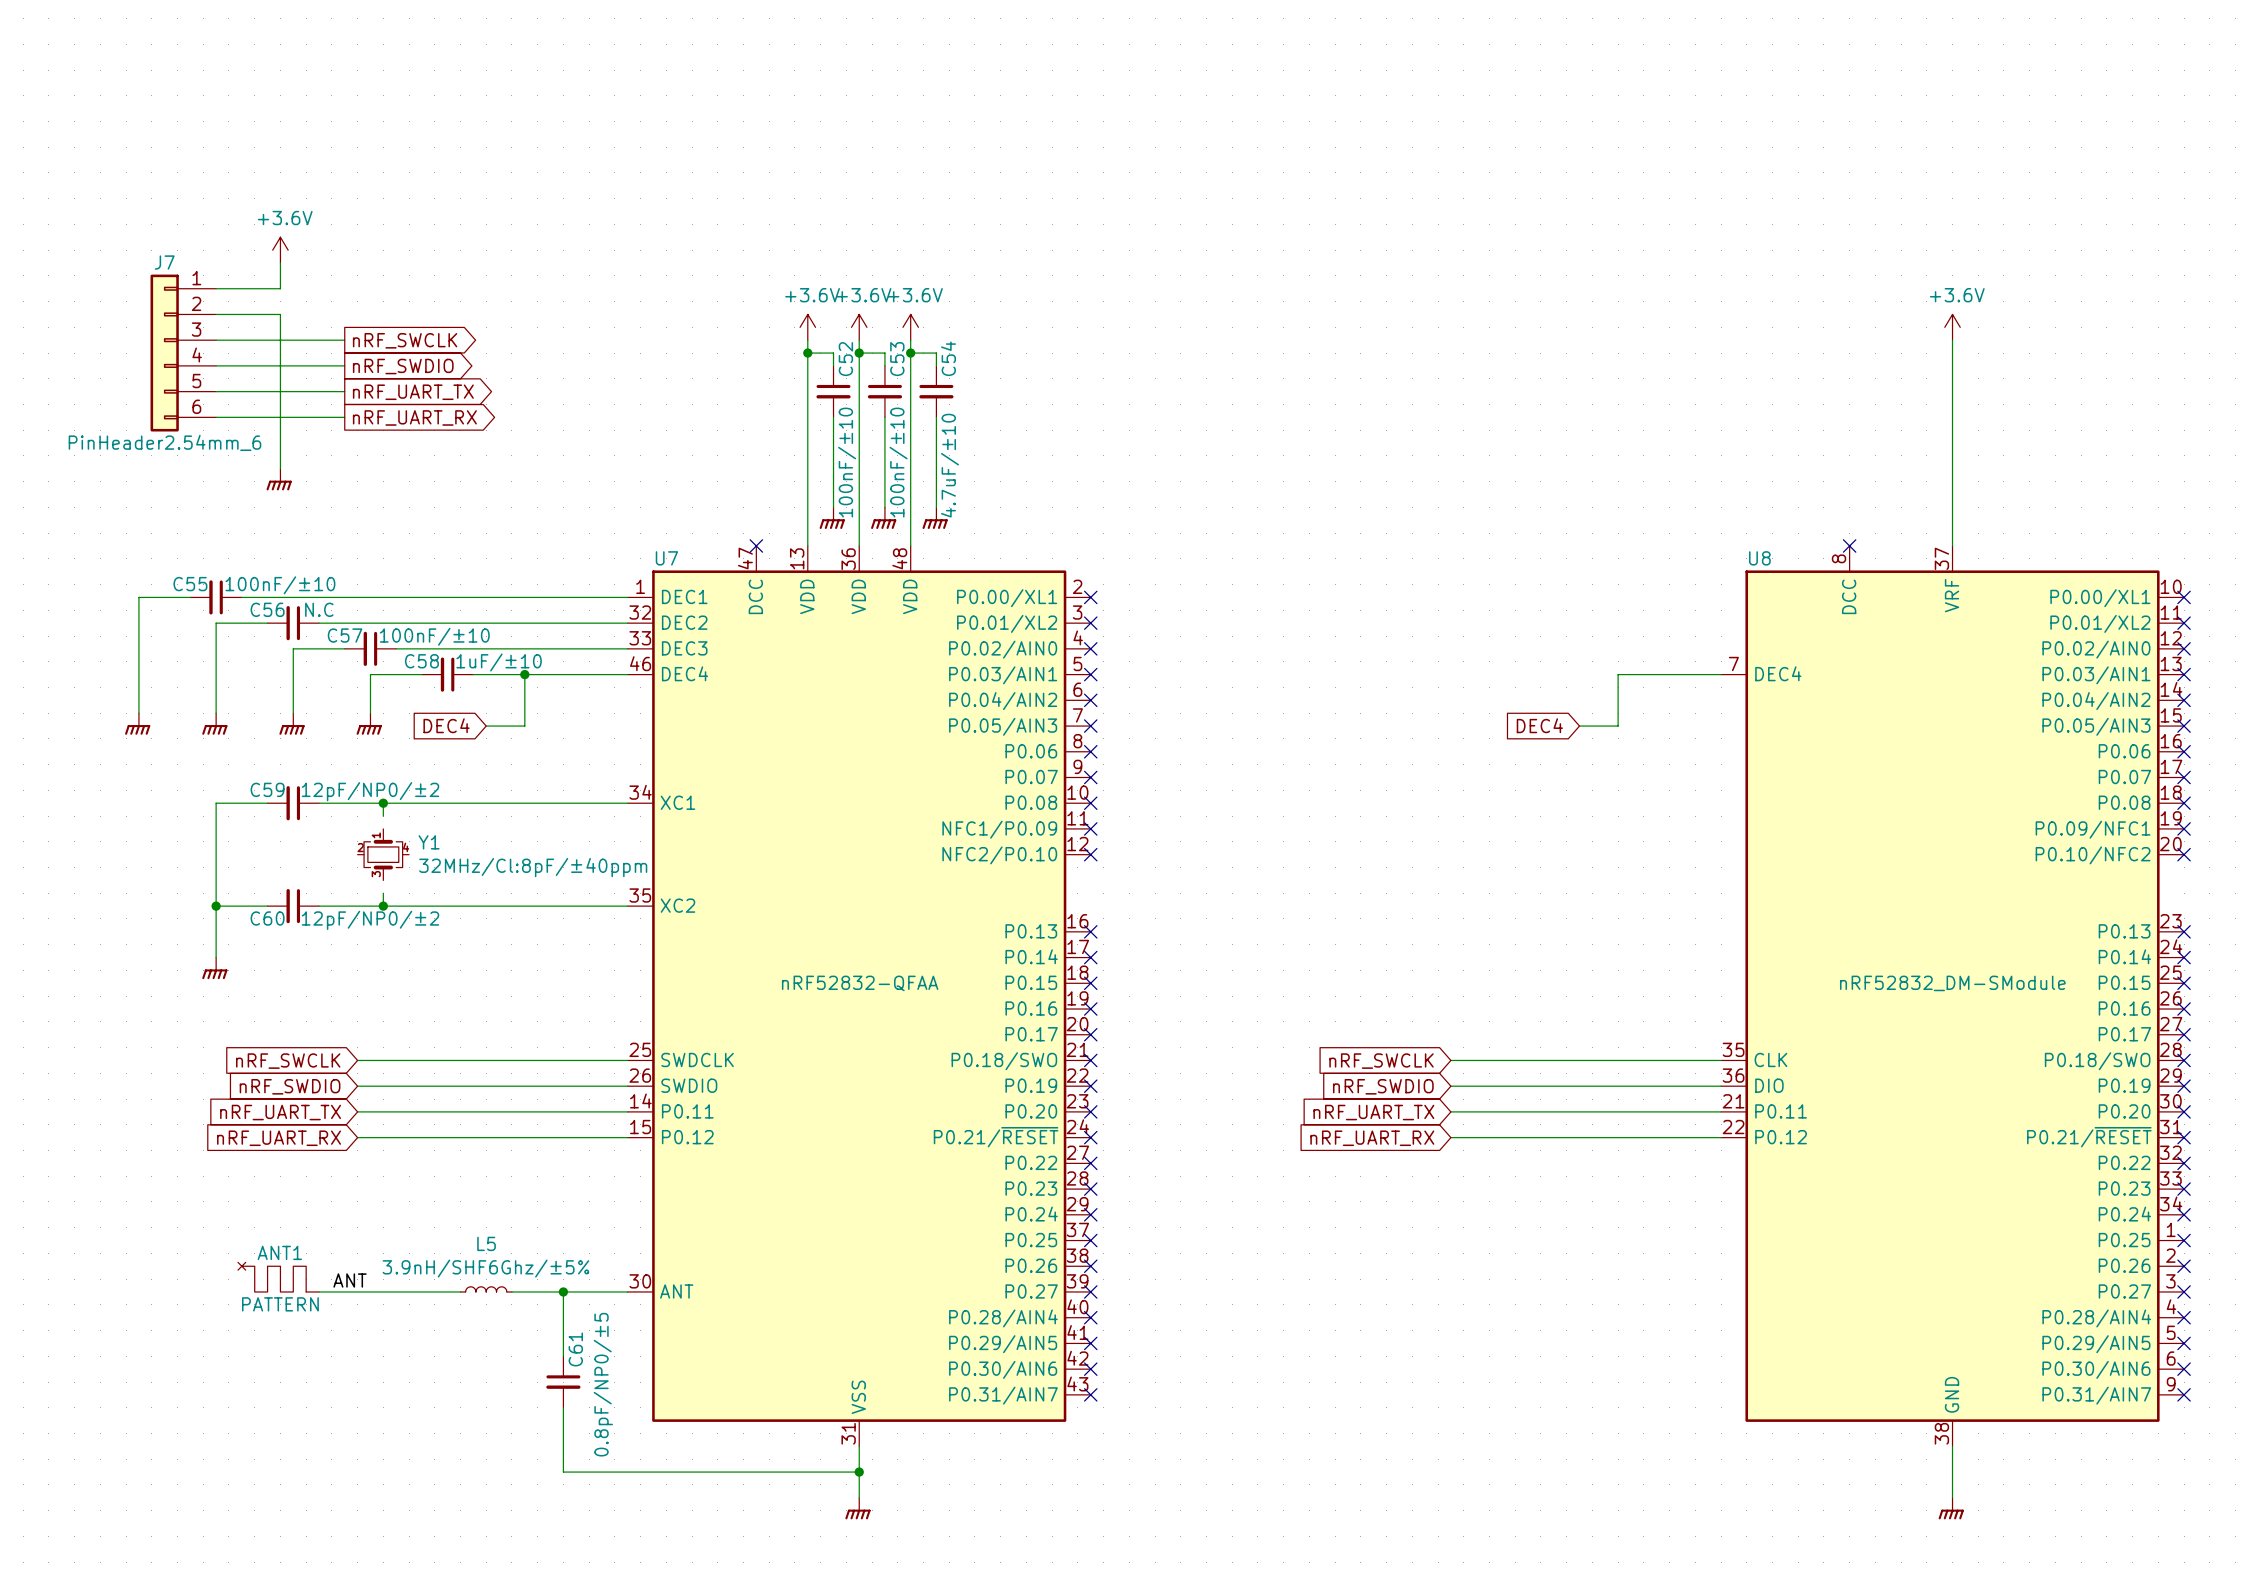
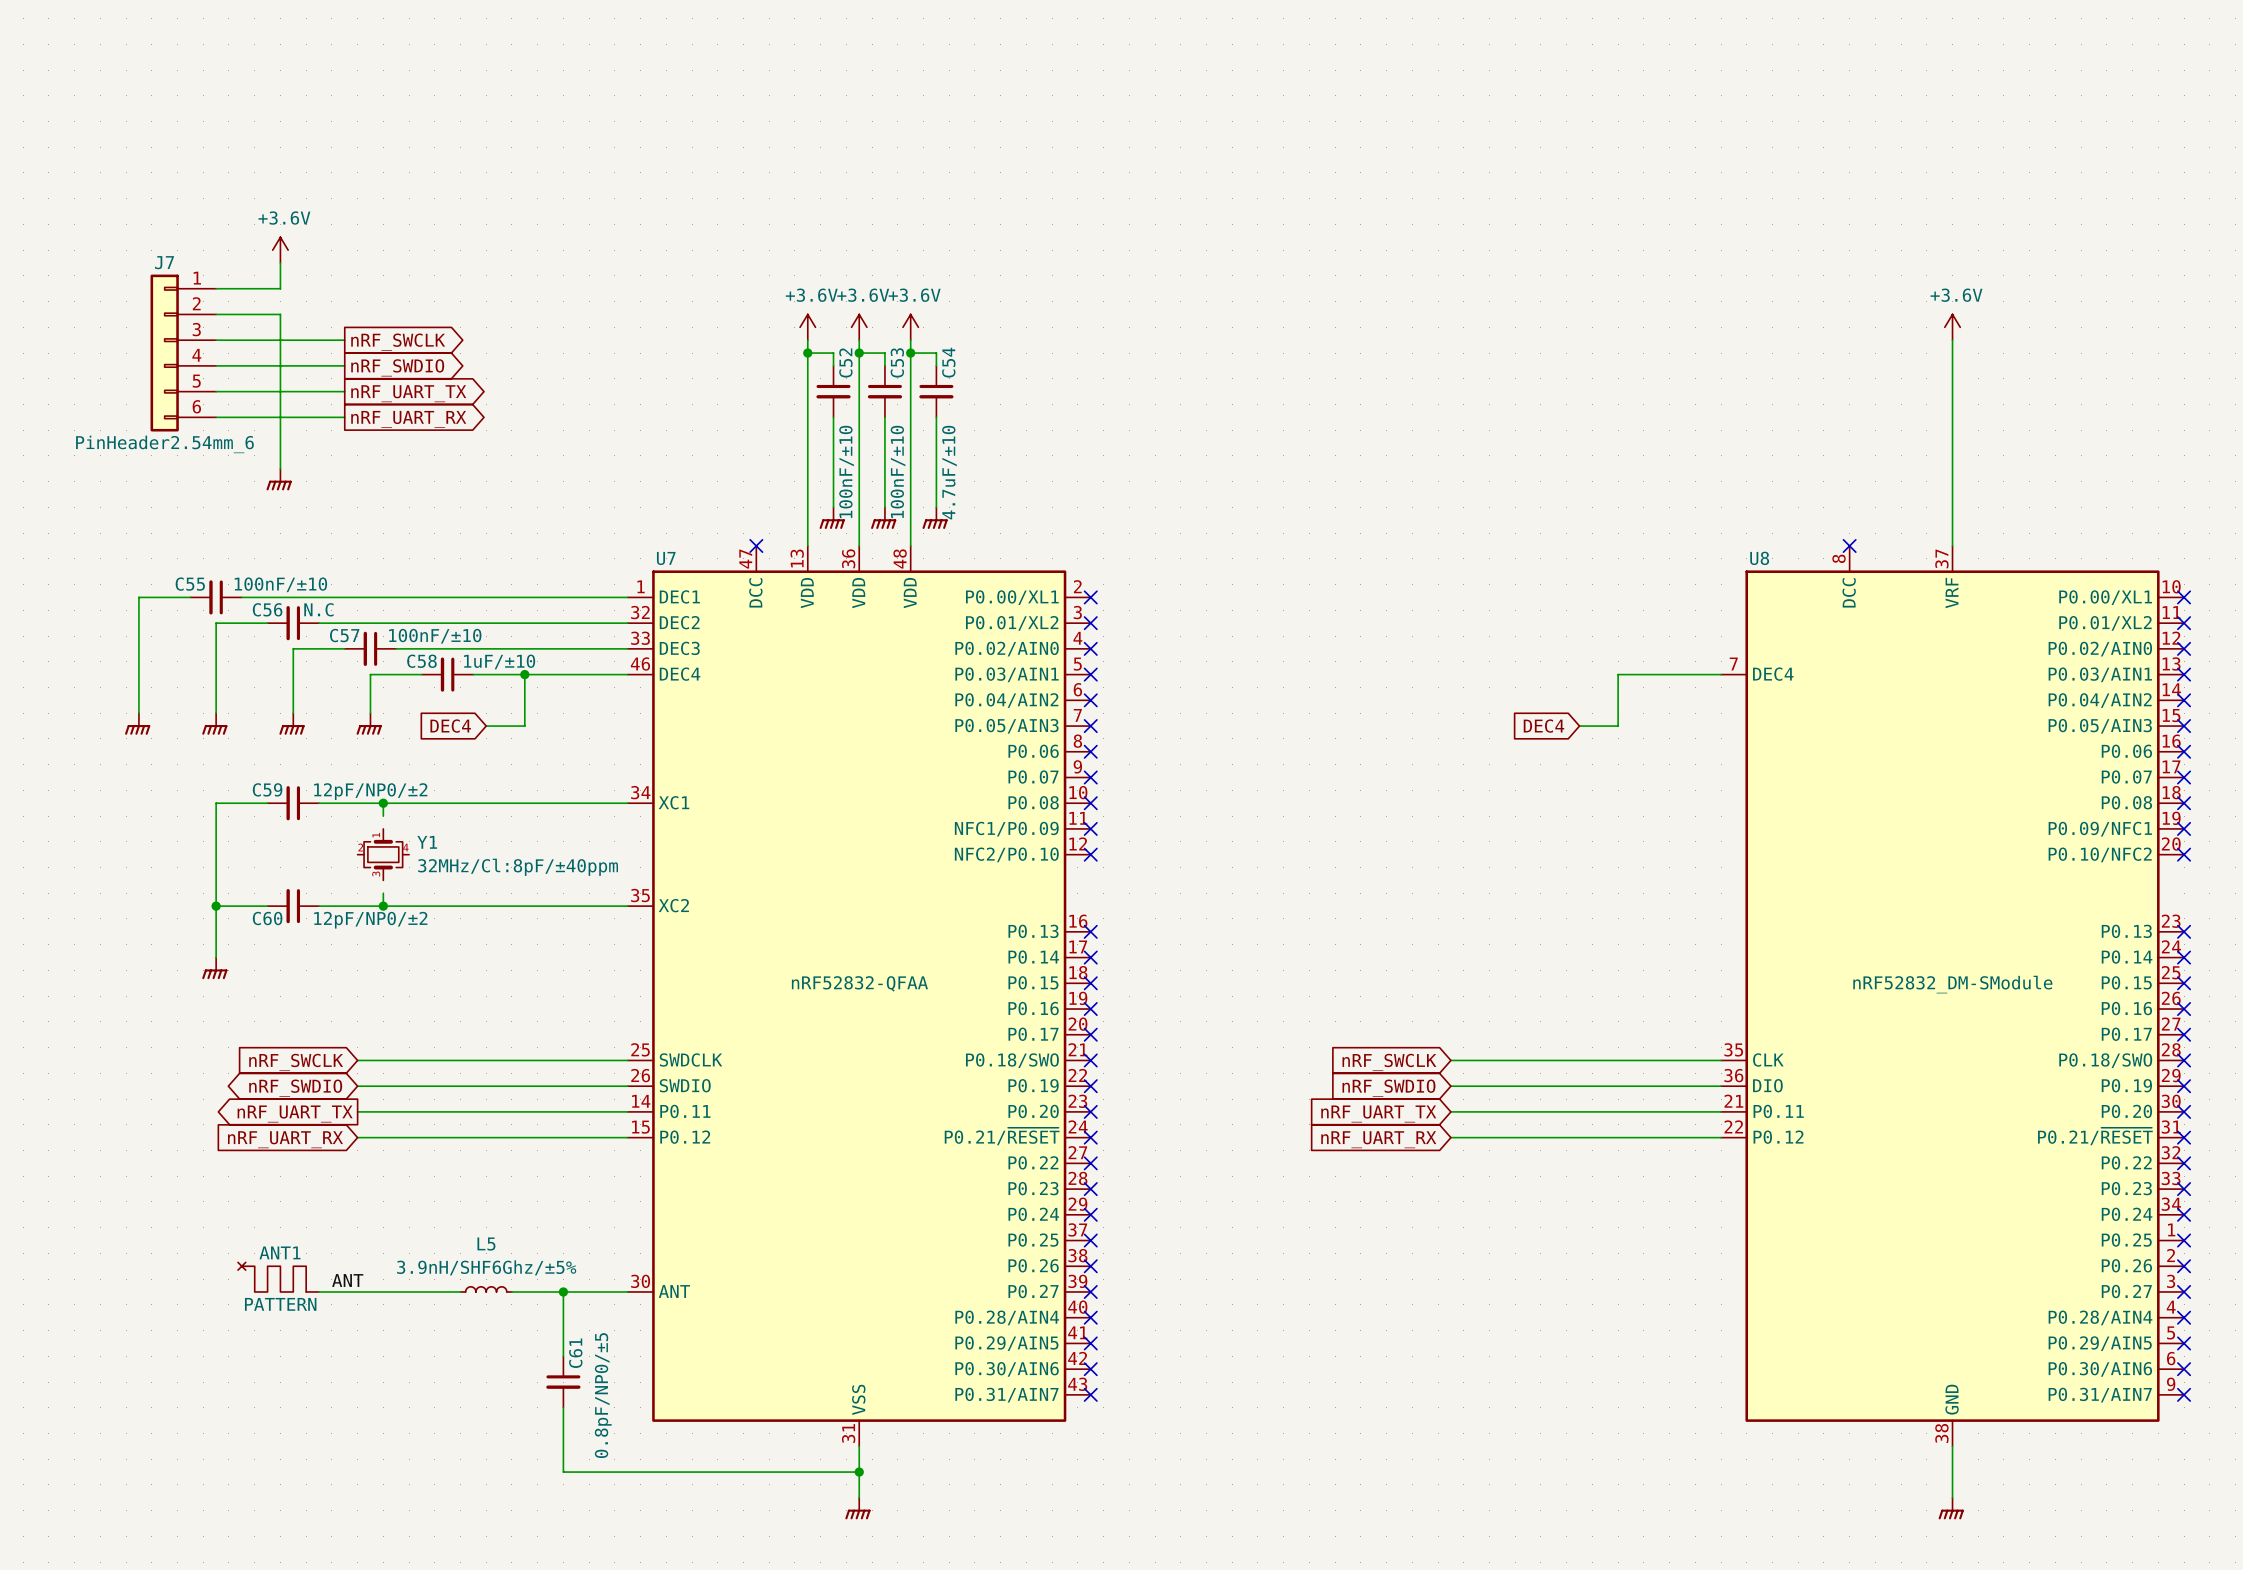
global label shape: input (290, 1086) -> bidirectional (295, 1088)
global label shape: input (280, 1112) -> output (295, 1113)

